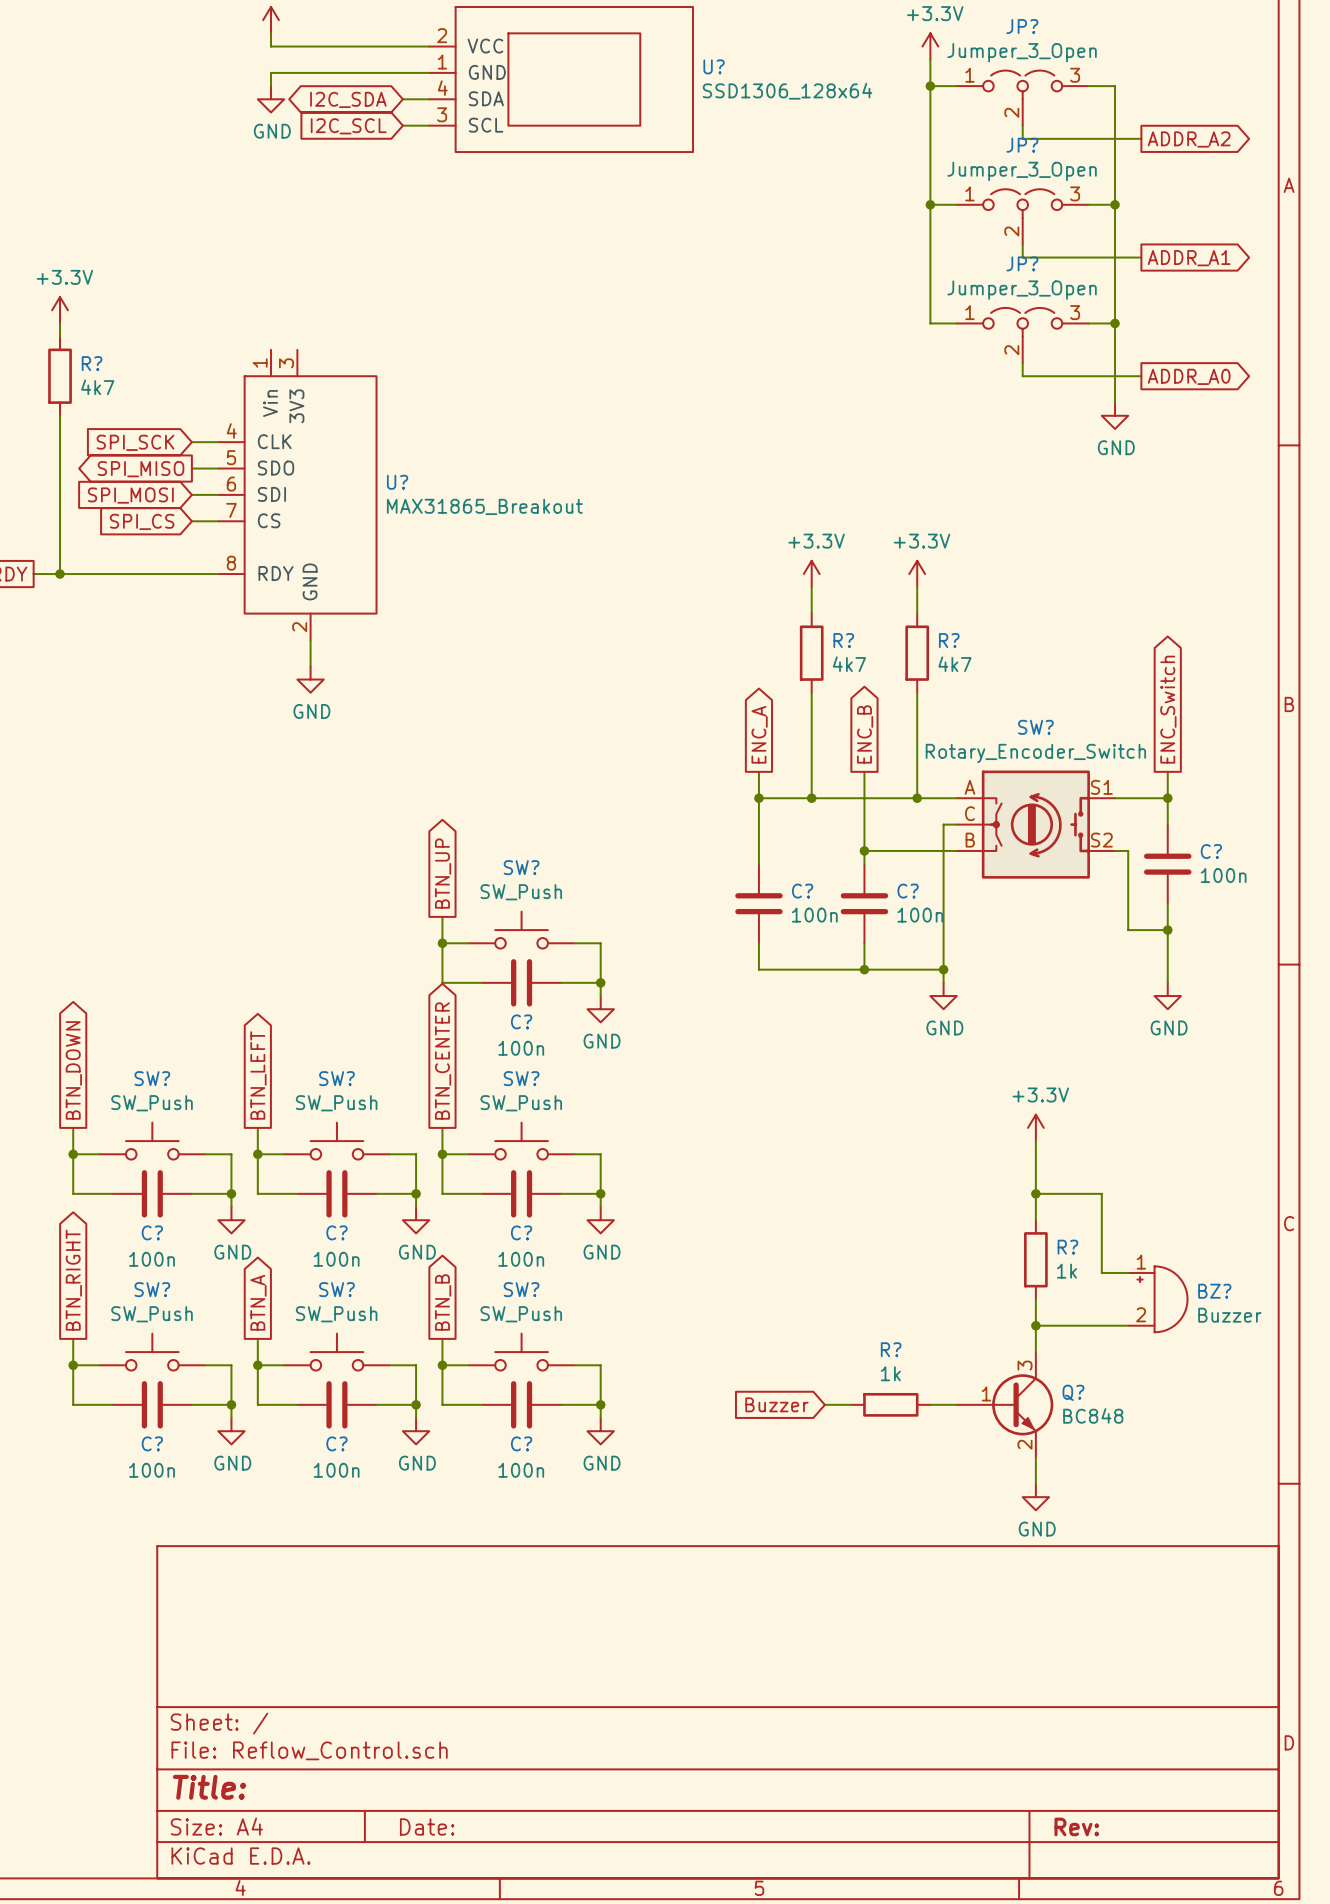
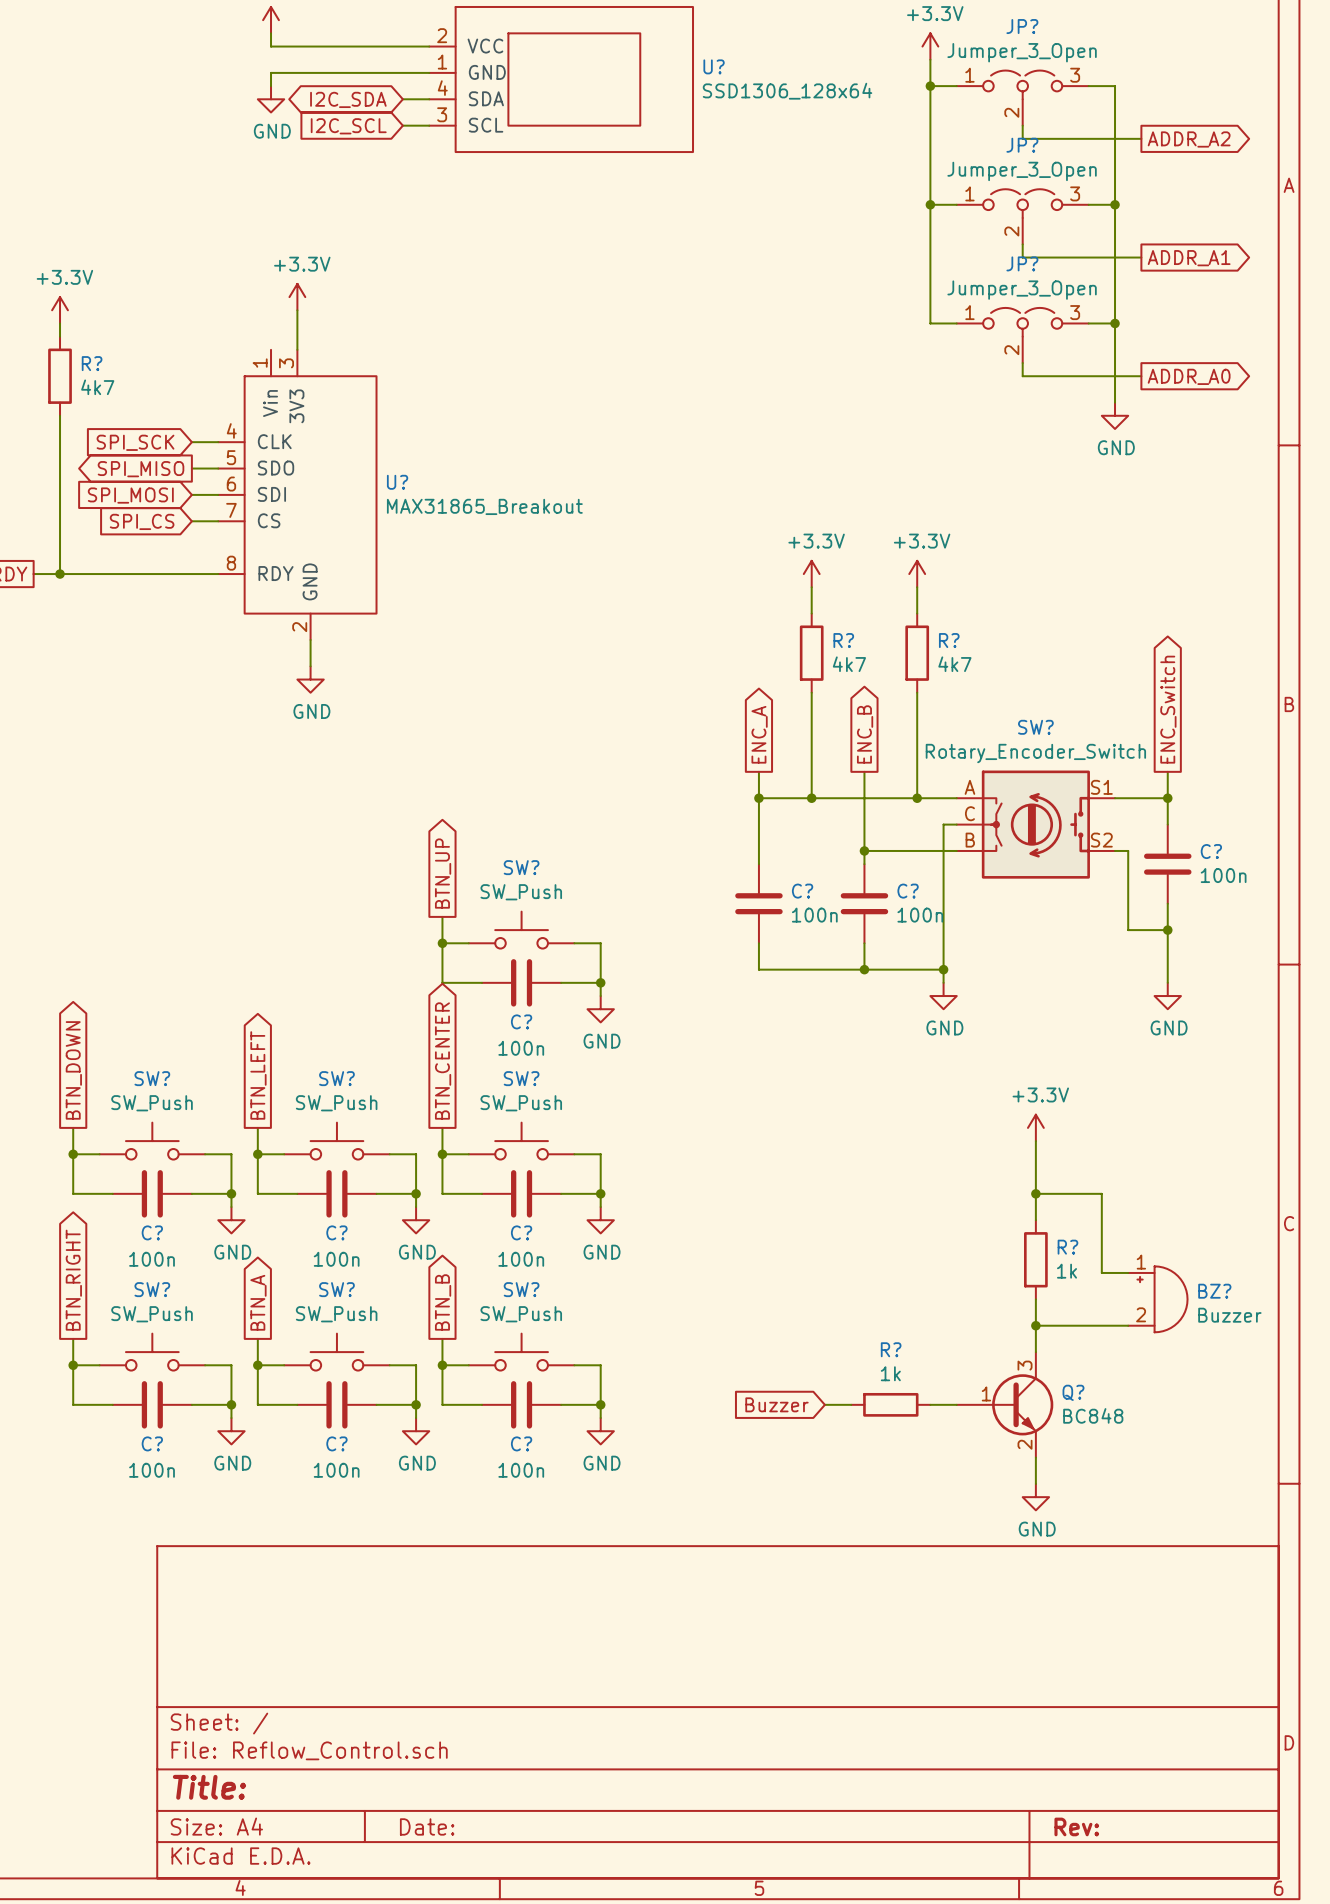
power symbol: none -> +3.3V (297, 297)
wire: none -> (297, 310) (297, 349)

